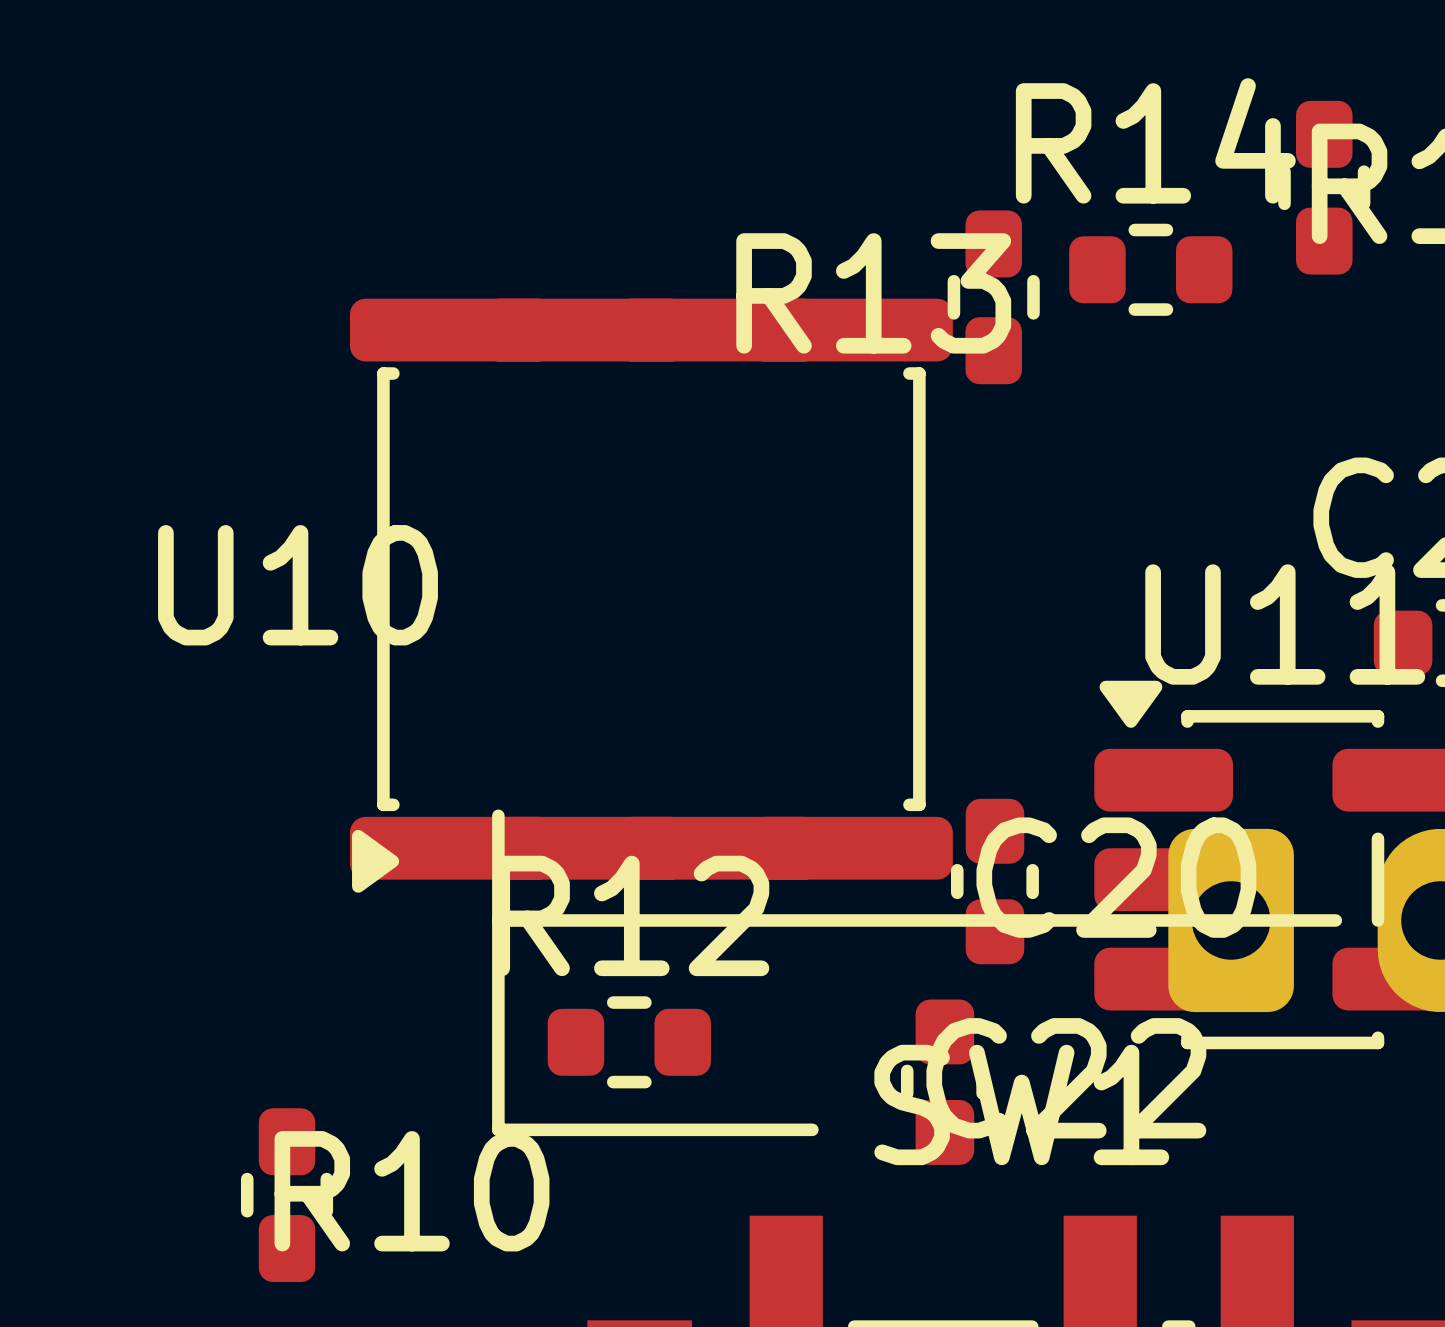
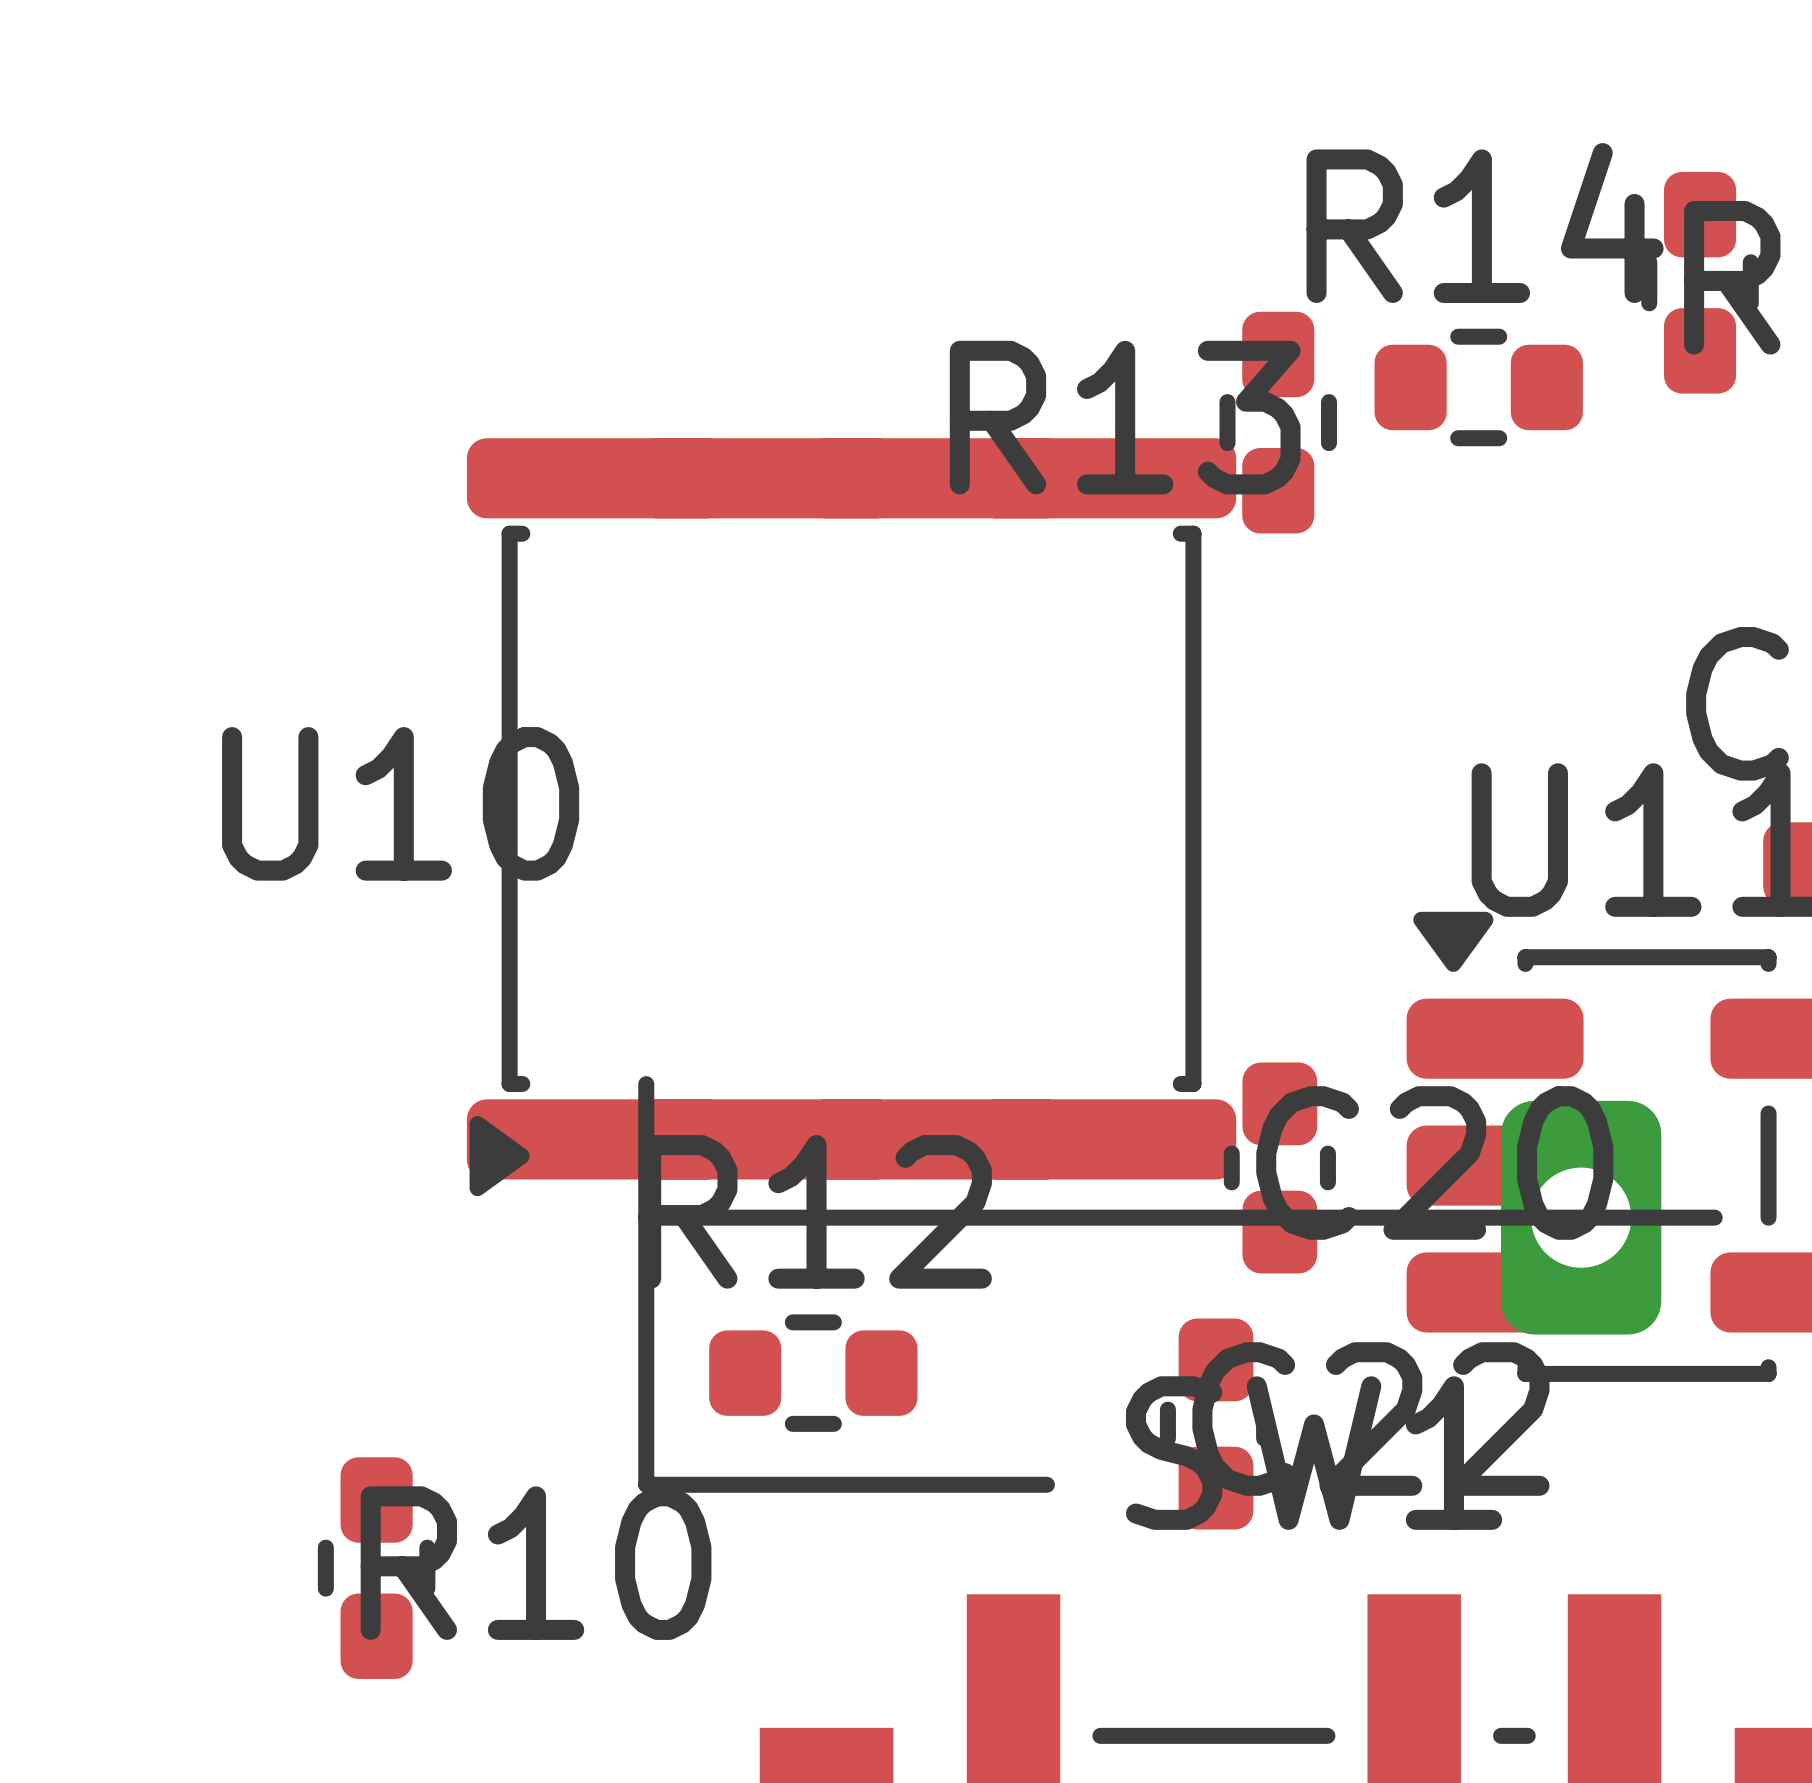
U10 position: (651, 595) -> (851, 817)

